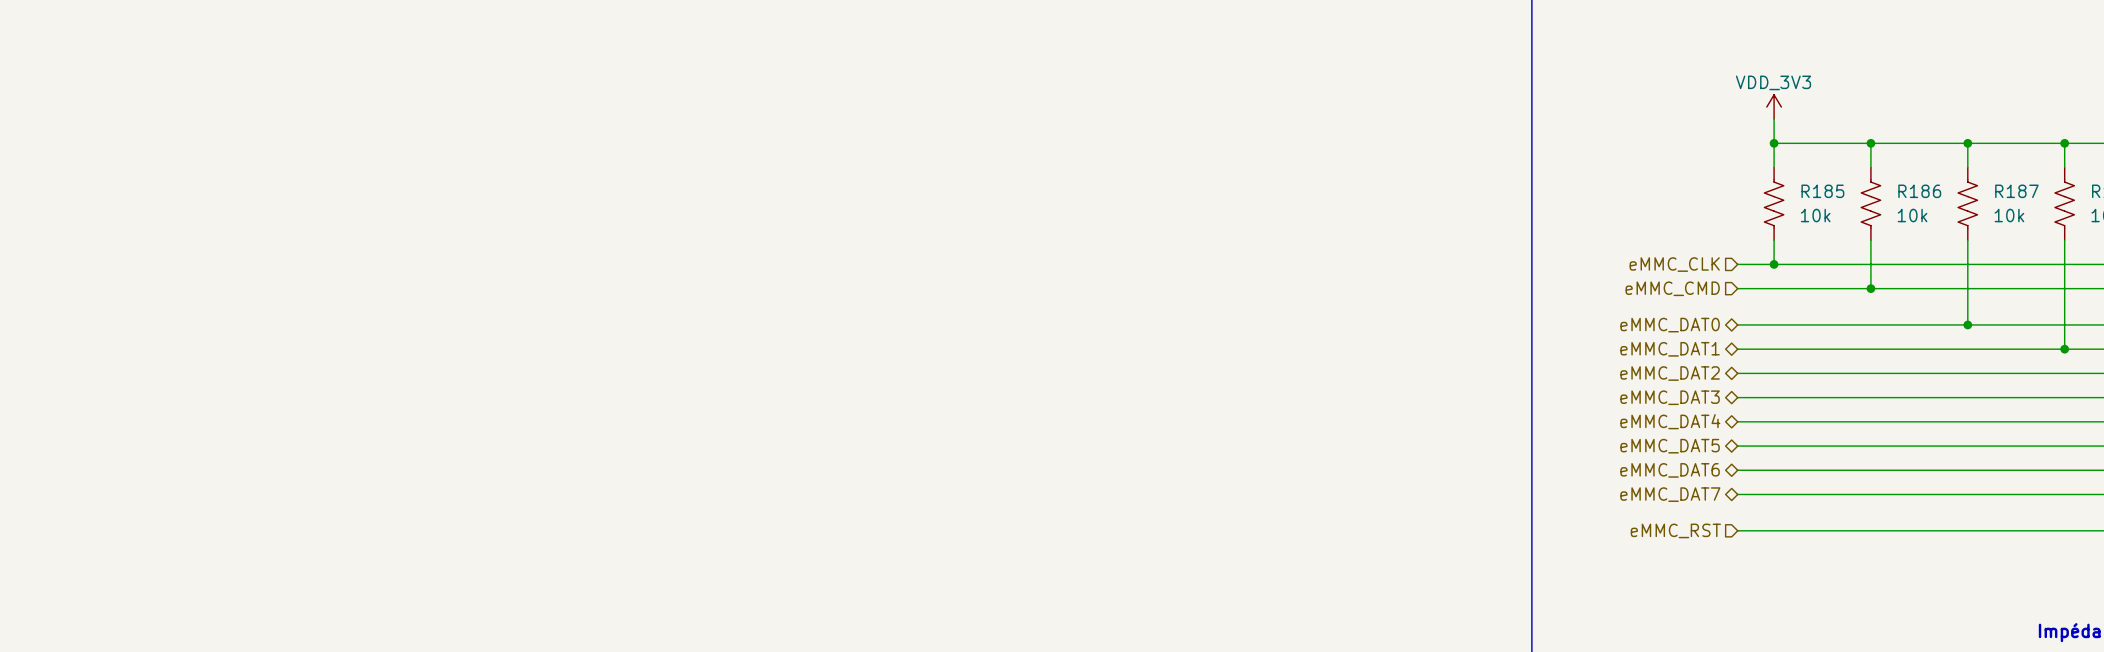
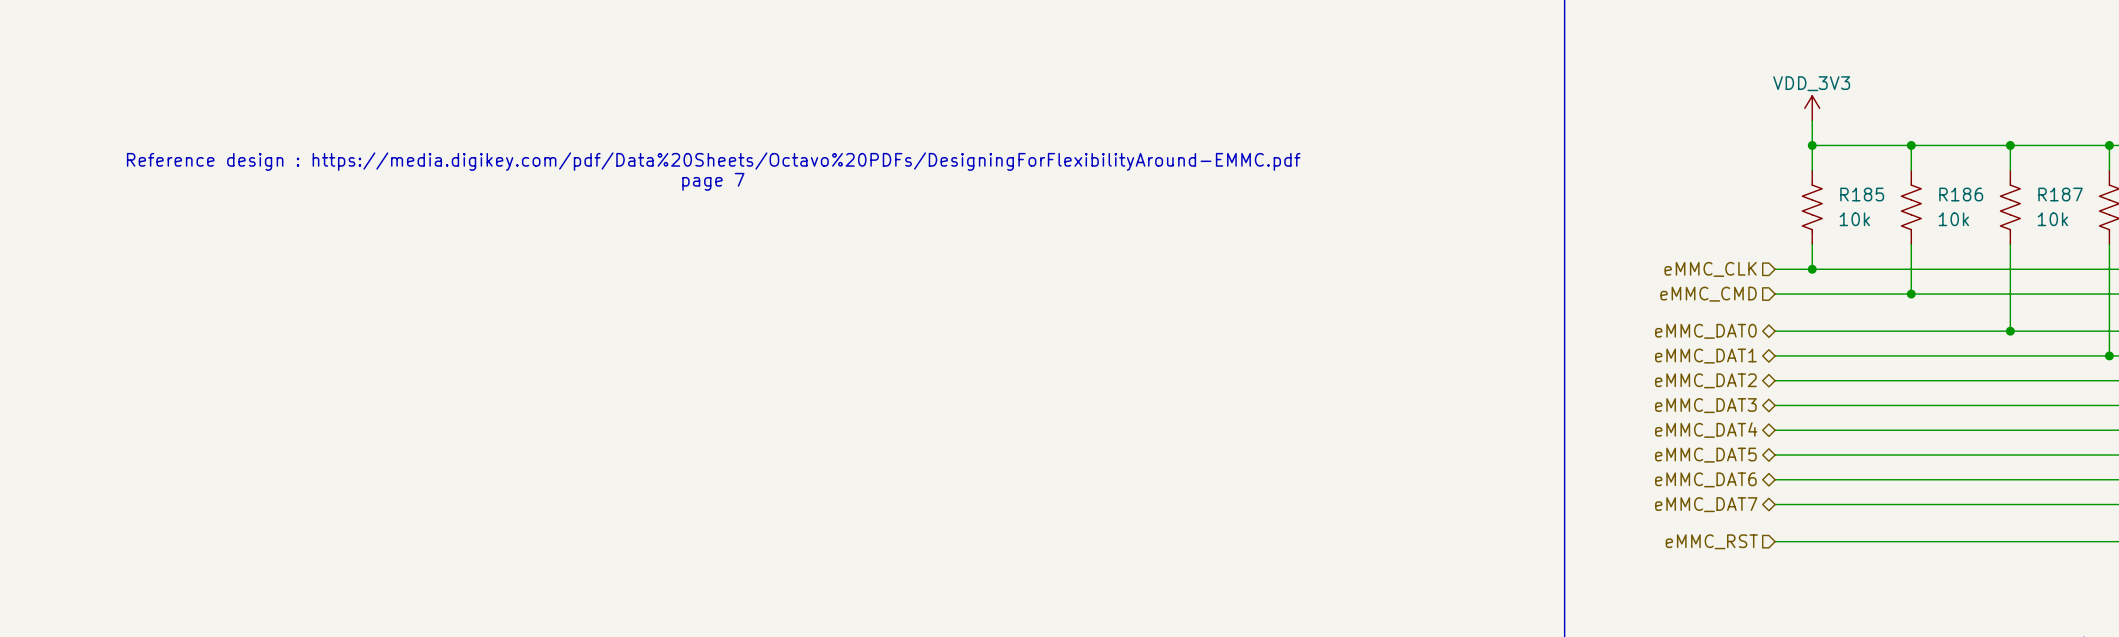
text: none -> Reference design : https://media.digikey.com/pdf/Data%20Sheets/Octavo%20PDFs/DesigningForFlexibilityAround-EMMC.pdf (713, 161)
text: none -> page 7 (713, 181)

